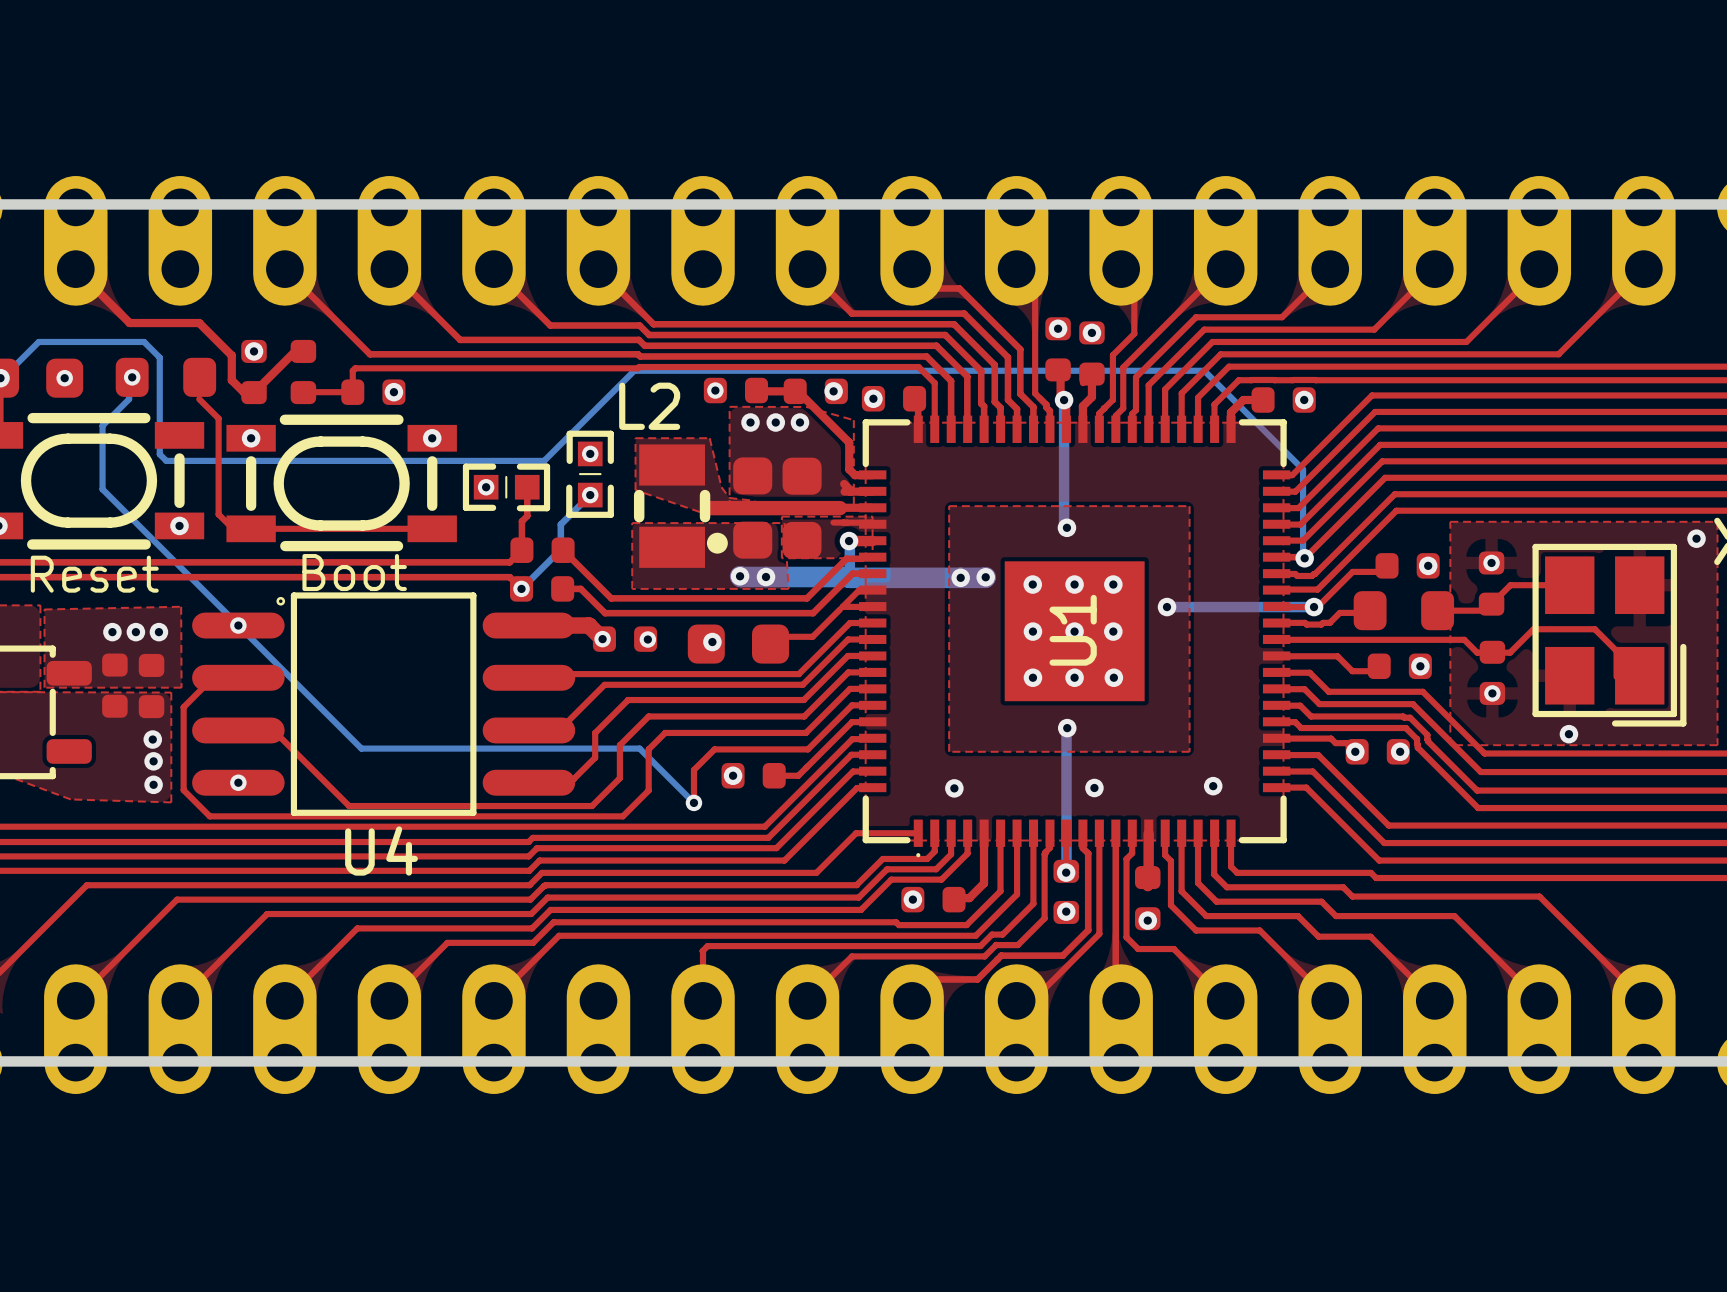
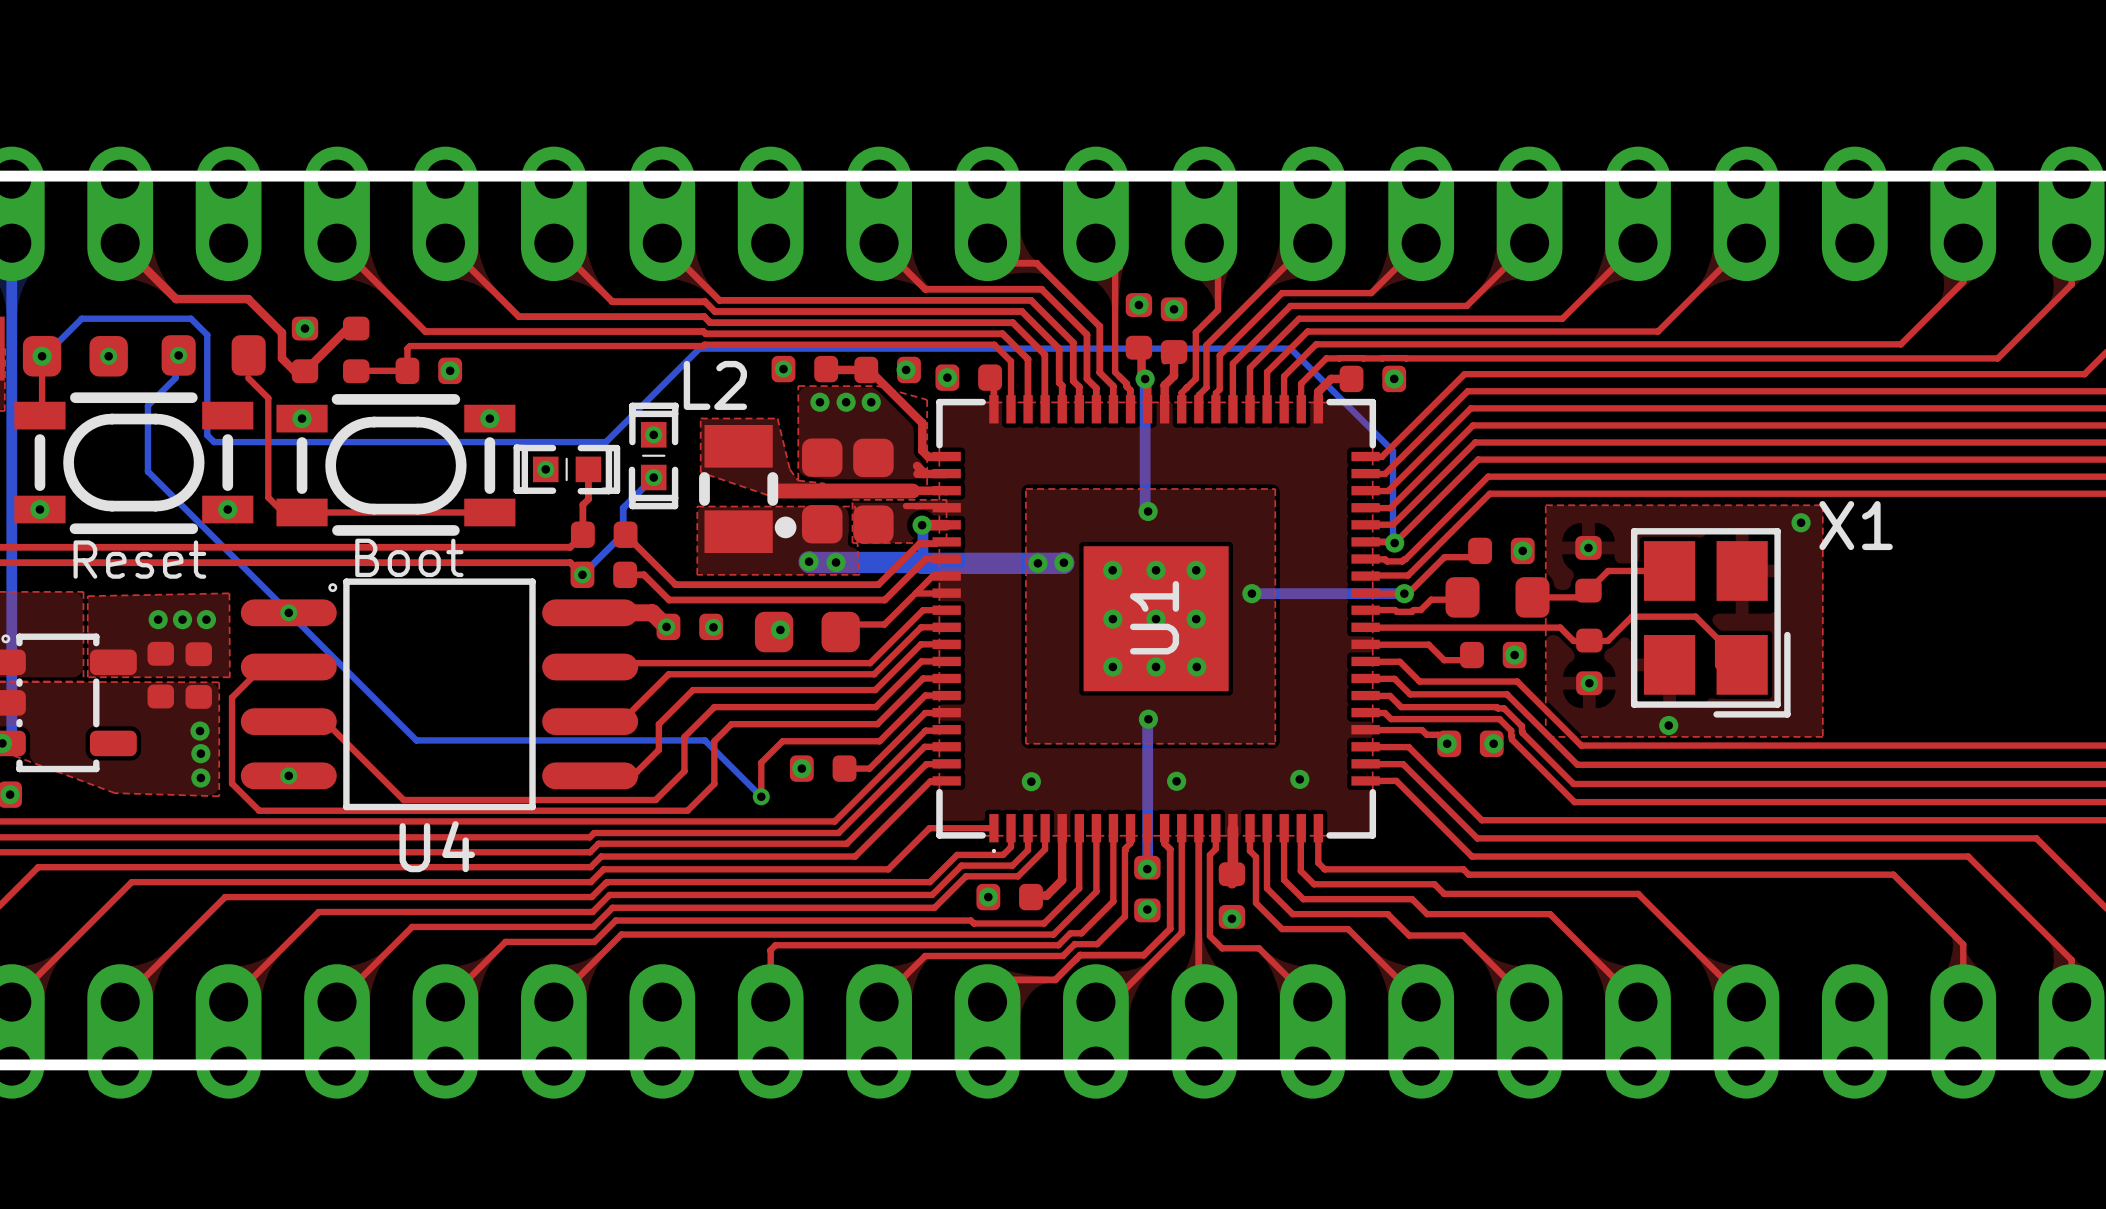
part footprint: [566, 430, 614, 518] -> [628, 402, 679, 510]
part footprint: [462, 463, 551, 512] -> [513, 444, 621, 495]

